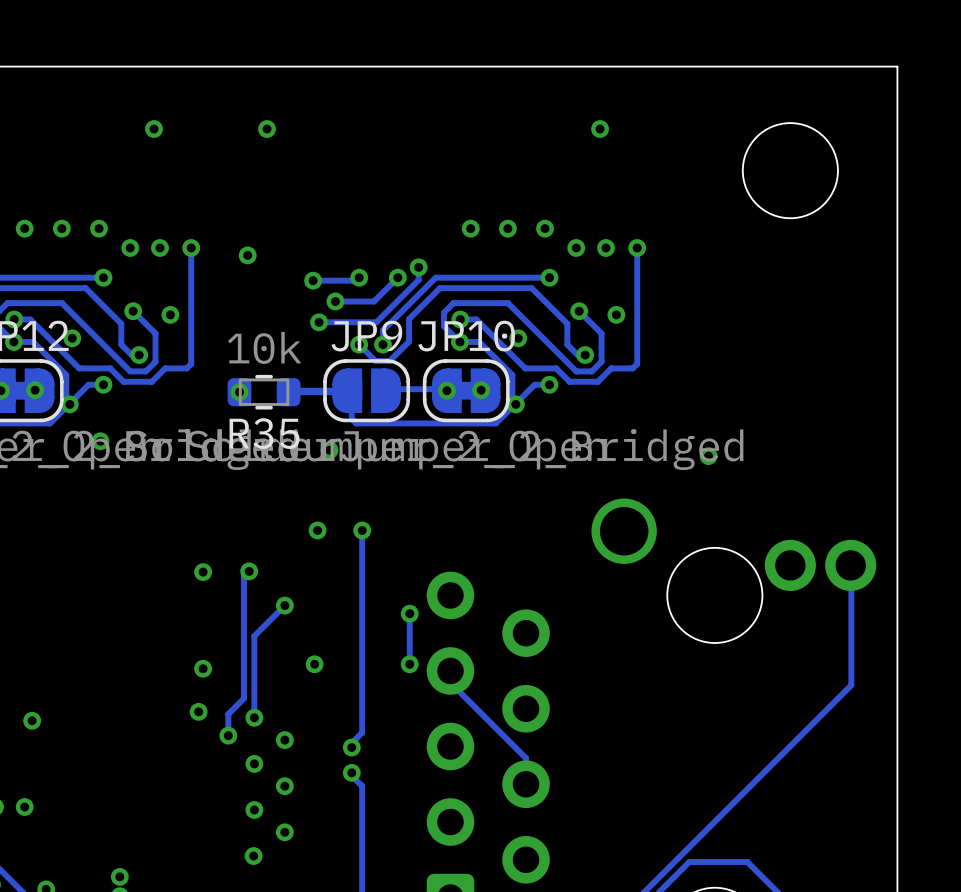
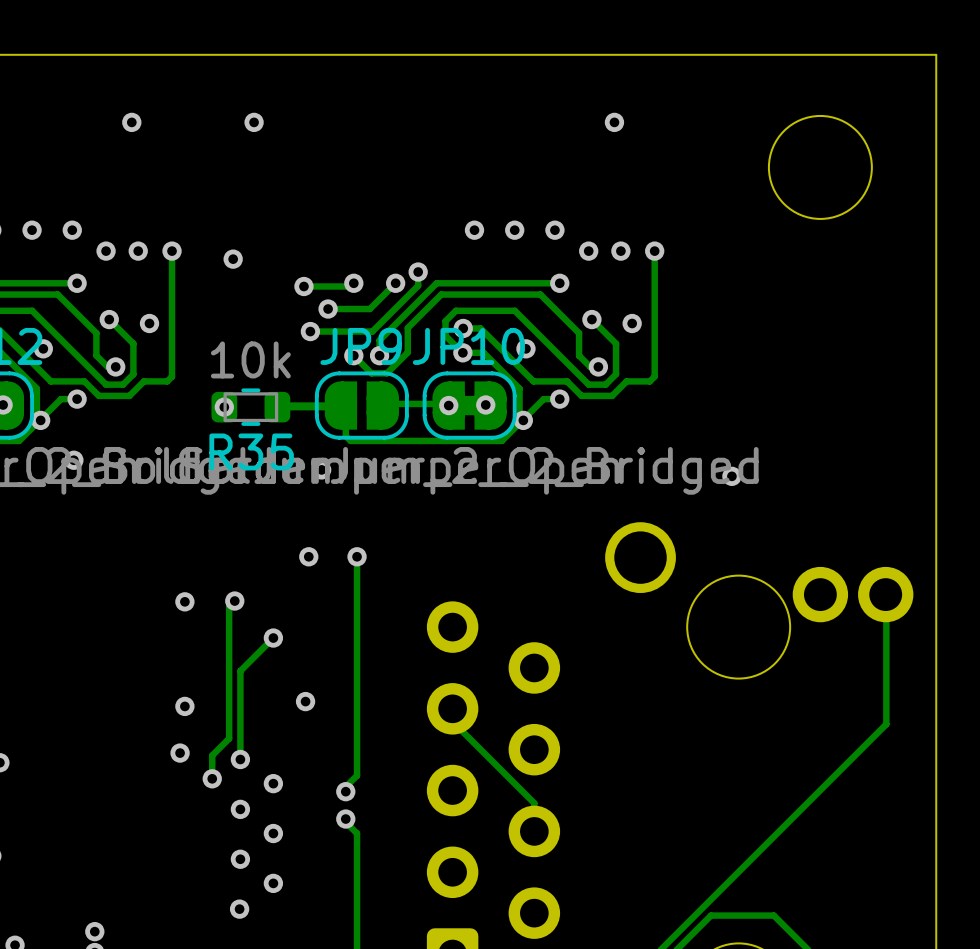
track: (409, 613) (409, 664) -> none
via: (409, 613) -> none
via: (409, 664) -> none

